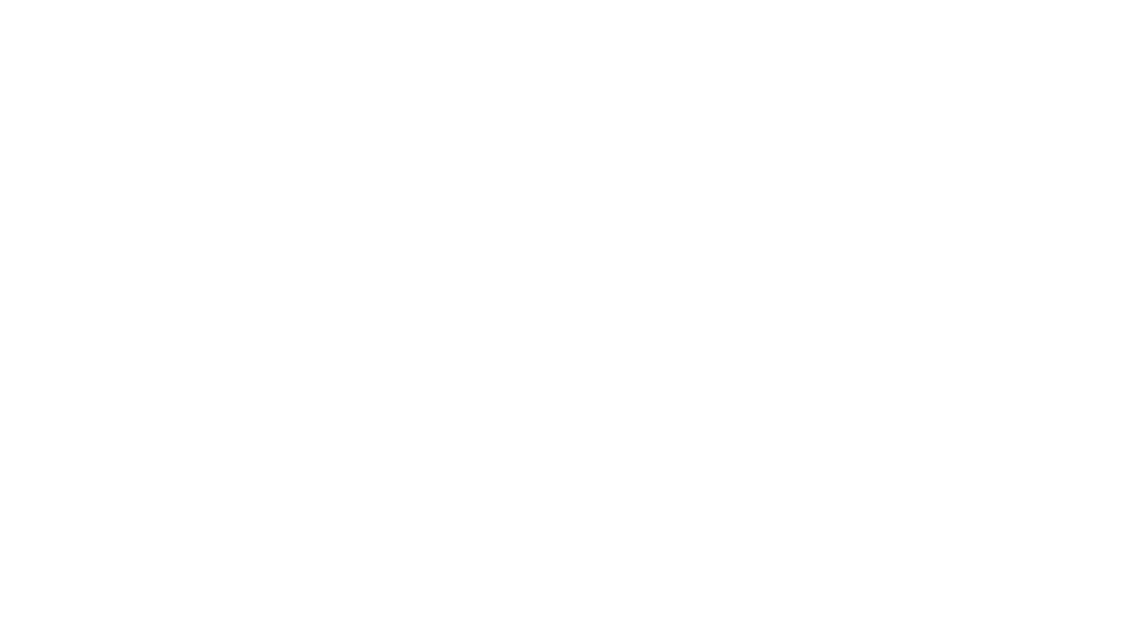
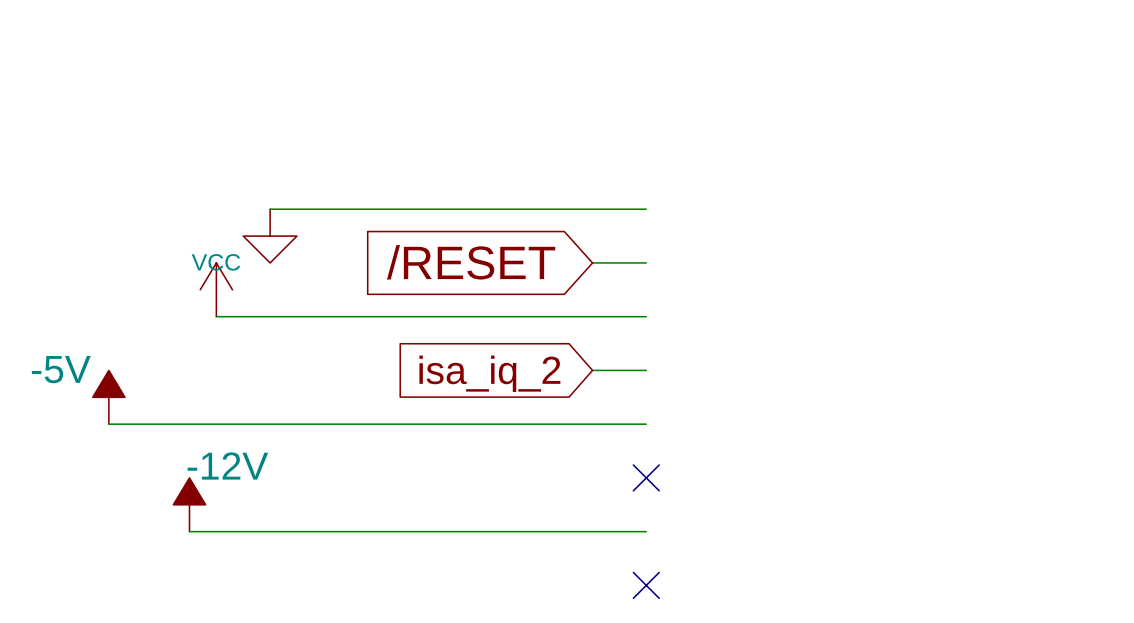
wire: none -> (270, 209) (646, 209)
power symbol: none -> (270, 236)
wire: none -> (592, 262) (646, 262)
global label: none -> /RESET (471, 262)
power symbol: none -> VCC (216, 289)
wire: none -> (216, 316) (646, 316)
wire: none -> (592, 370) (646, 370)
global label: none -> isa_iq_2 (489, 373)
power symbol: none -> -5V (108, 397)
wire: none -> (108, 424) (646, 424)
no-connect mark: none -> (646, 477)
power symbol: none -> -12V (189, 504)
wire: none -> (189, 531) (646, 531)
no-connect mark: none -> (646, 585)

